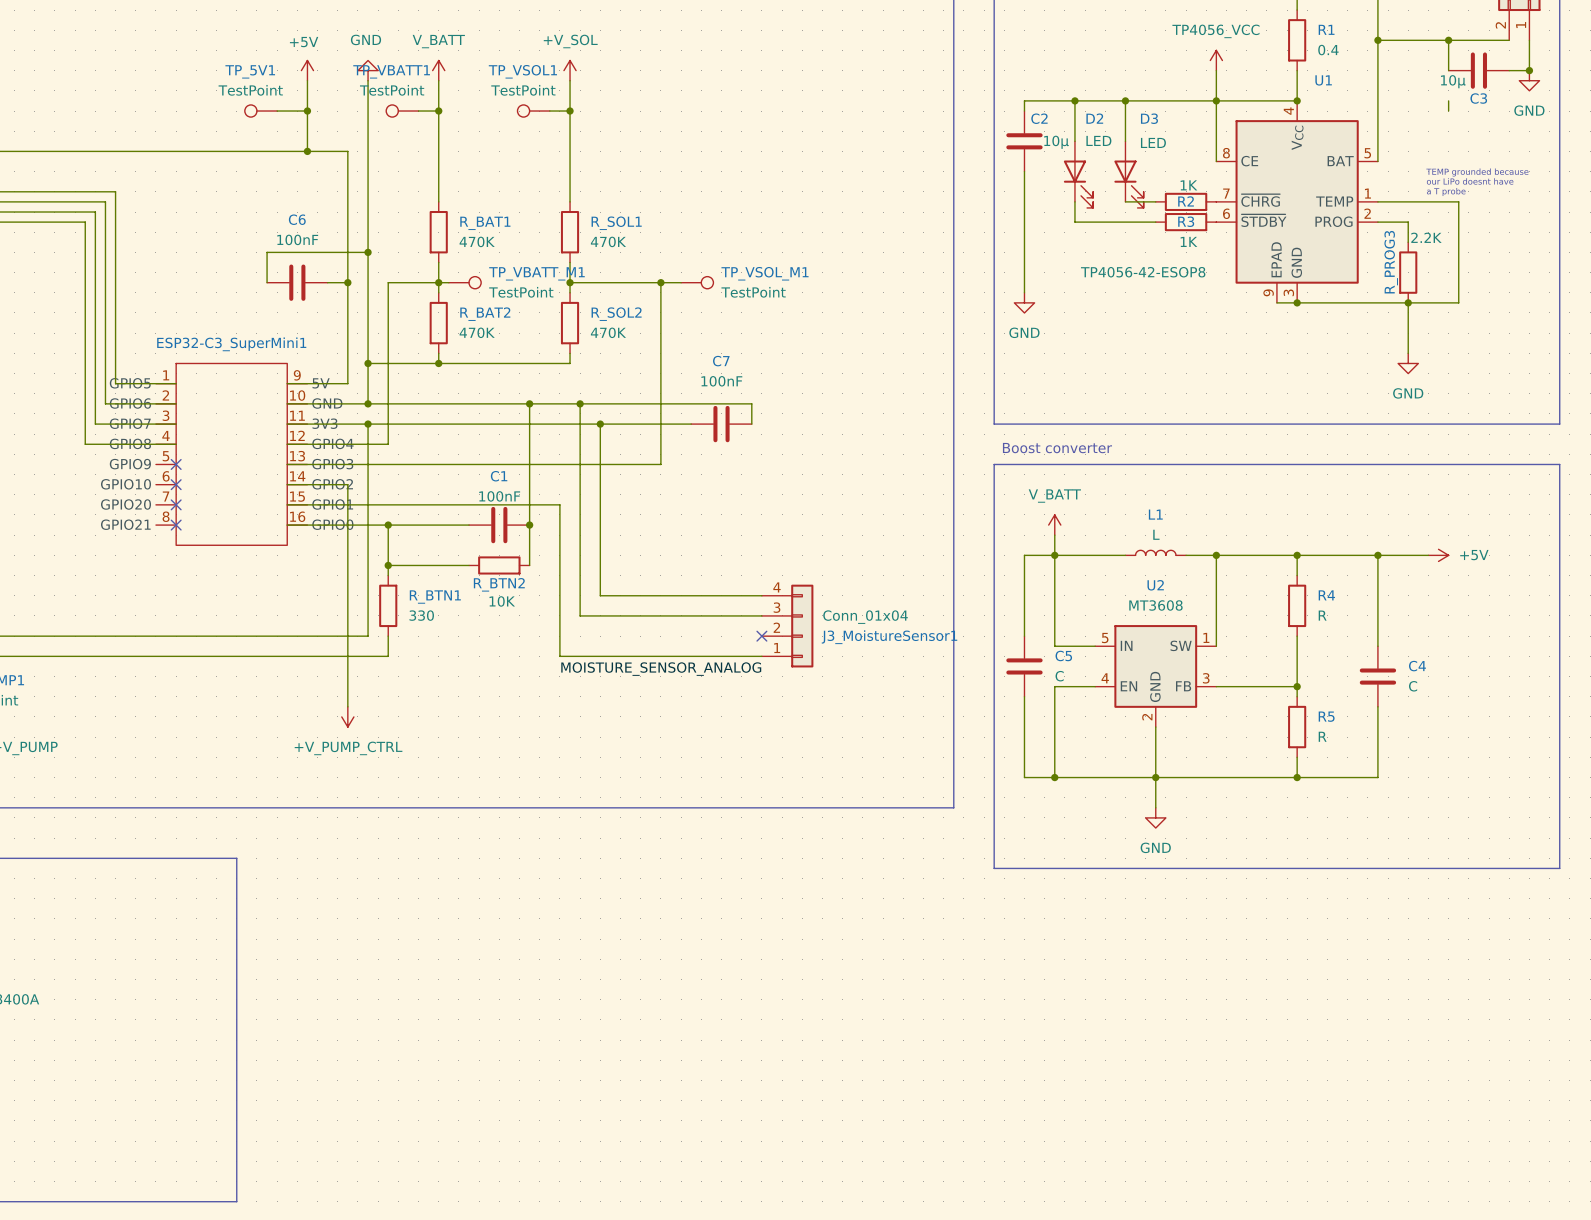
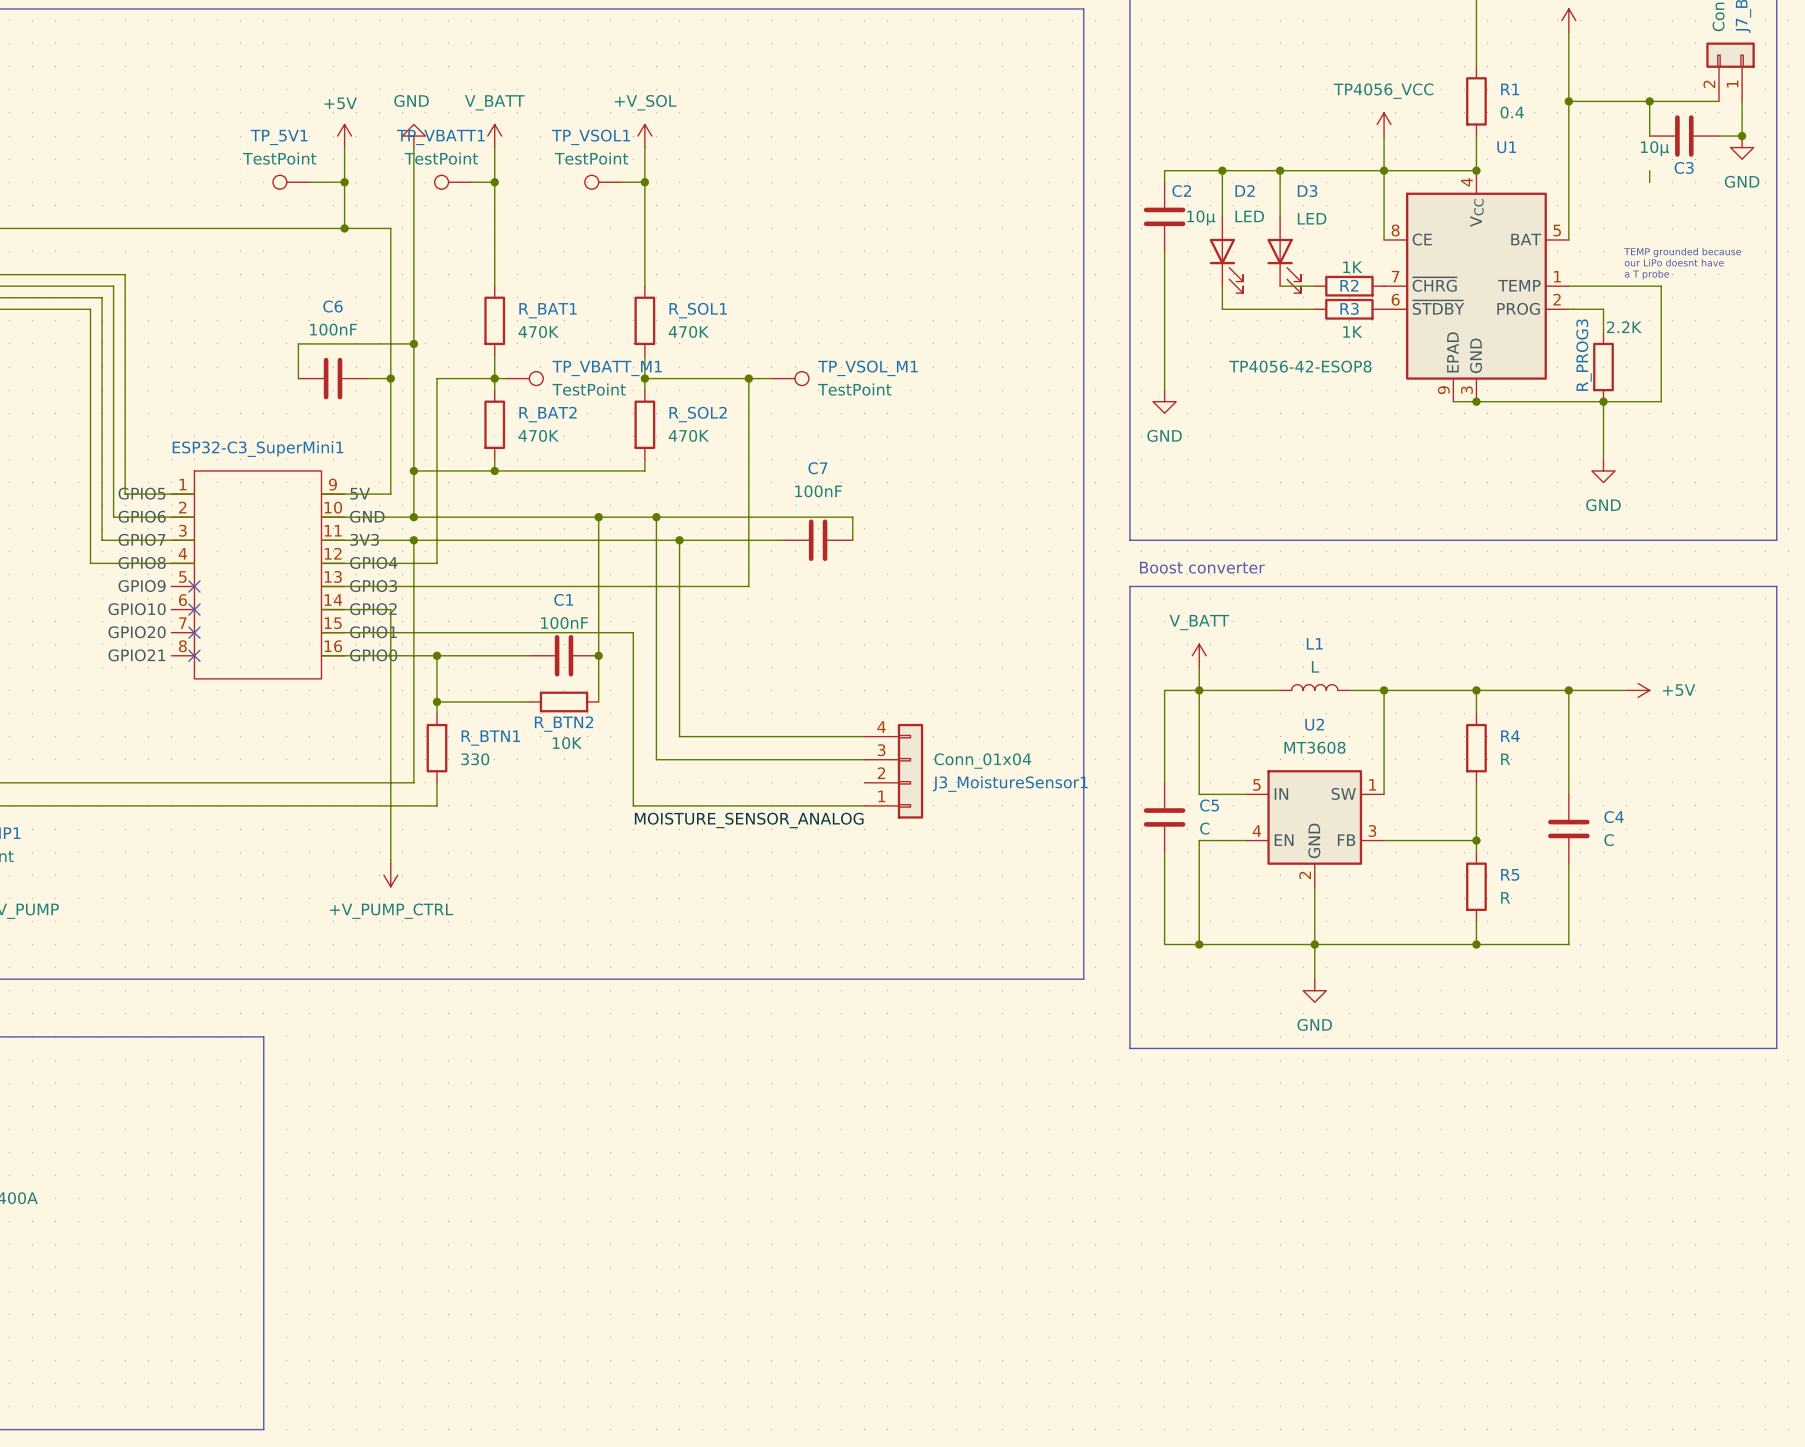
no-connect mark: (761, 636) -> none

